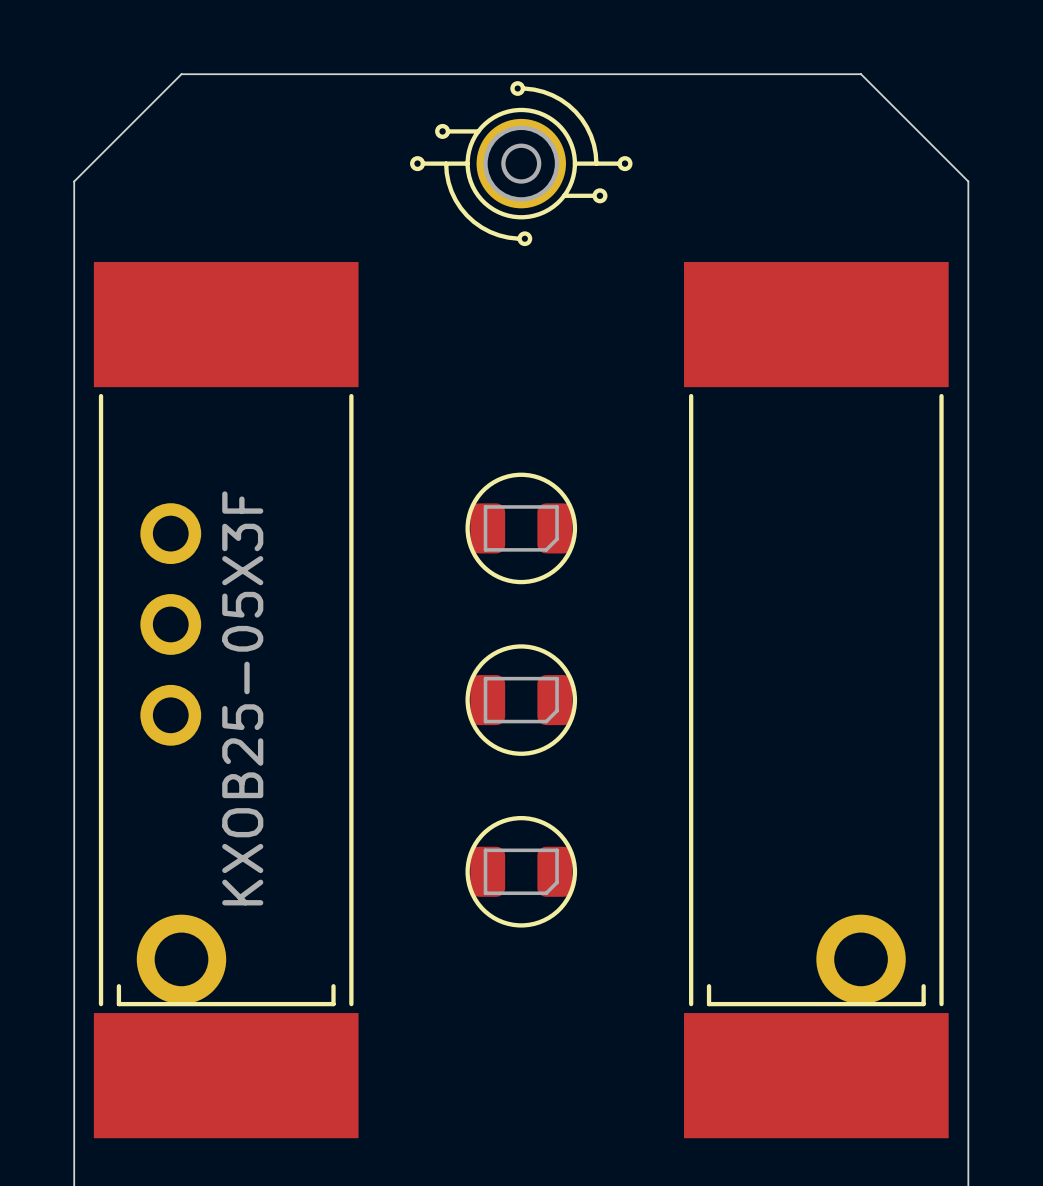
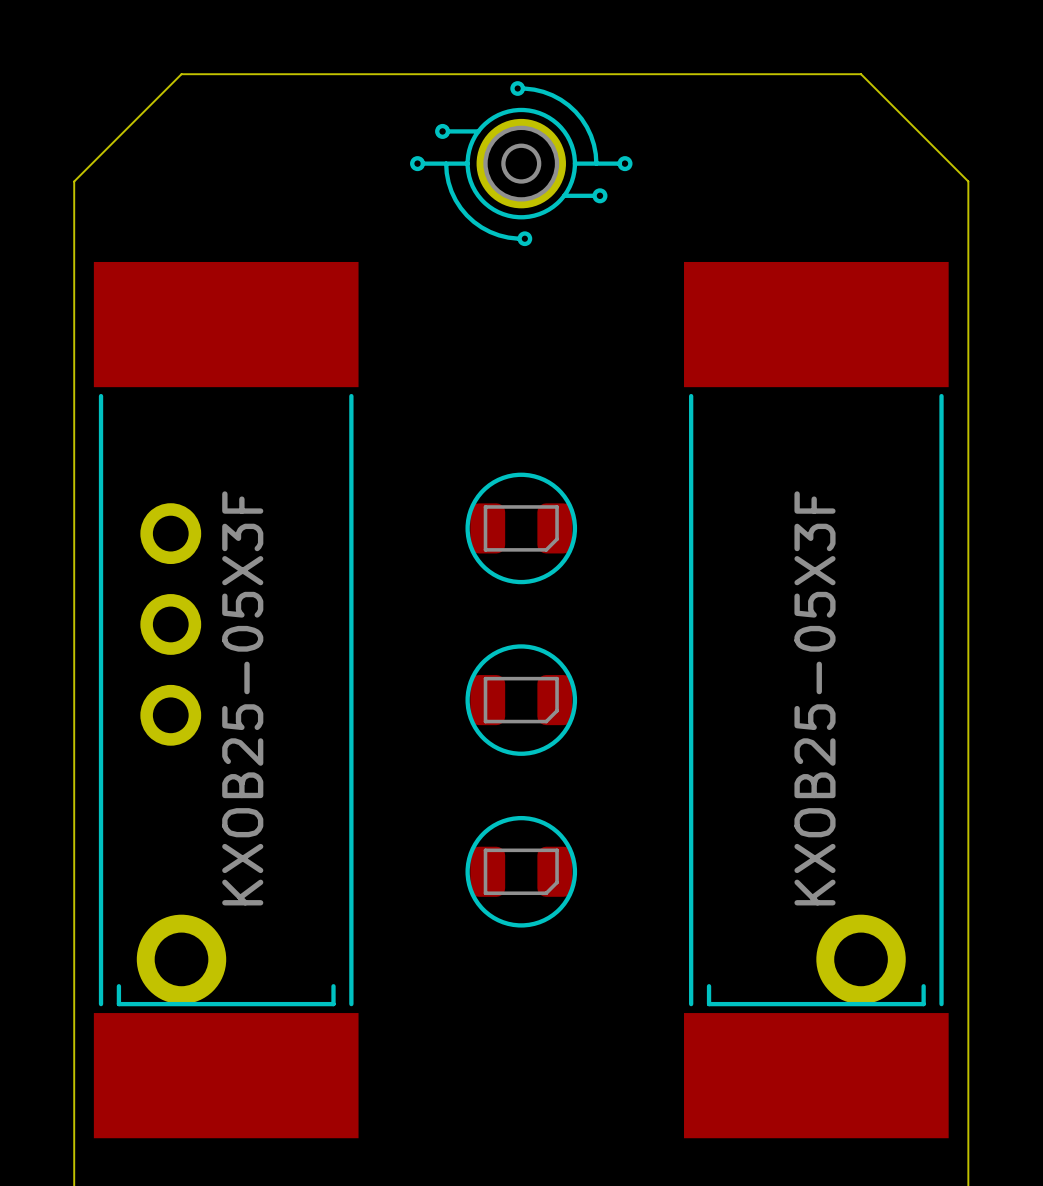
part value: none -> KXOB25-05X3F (815, 698)

